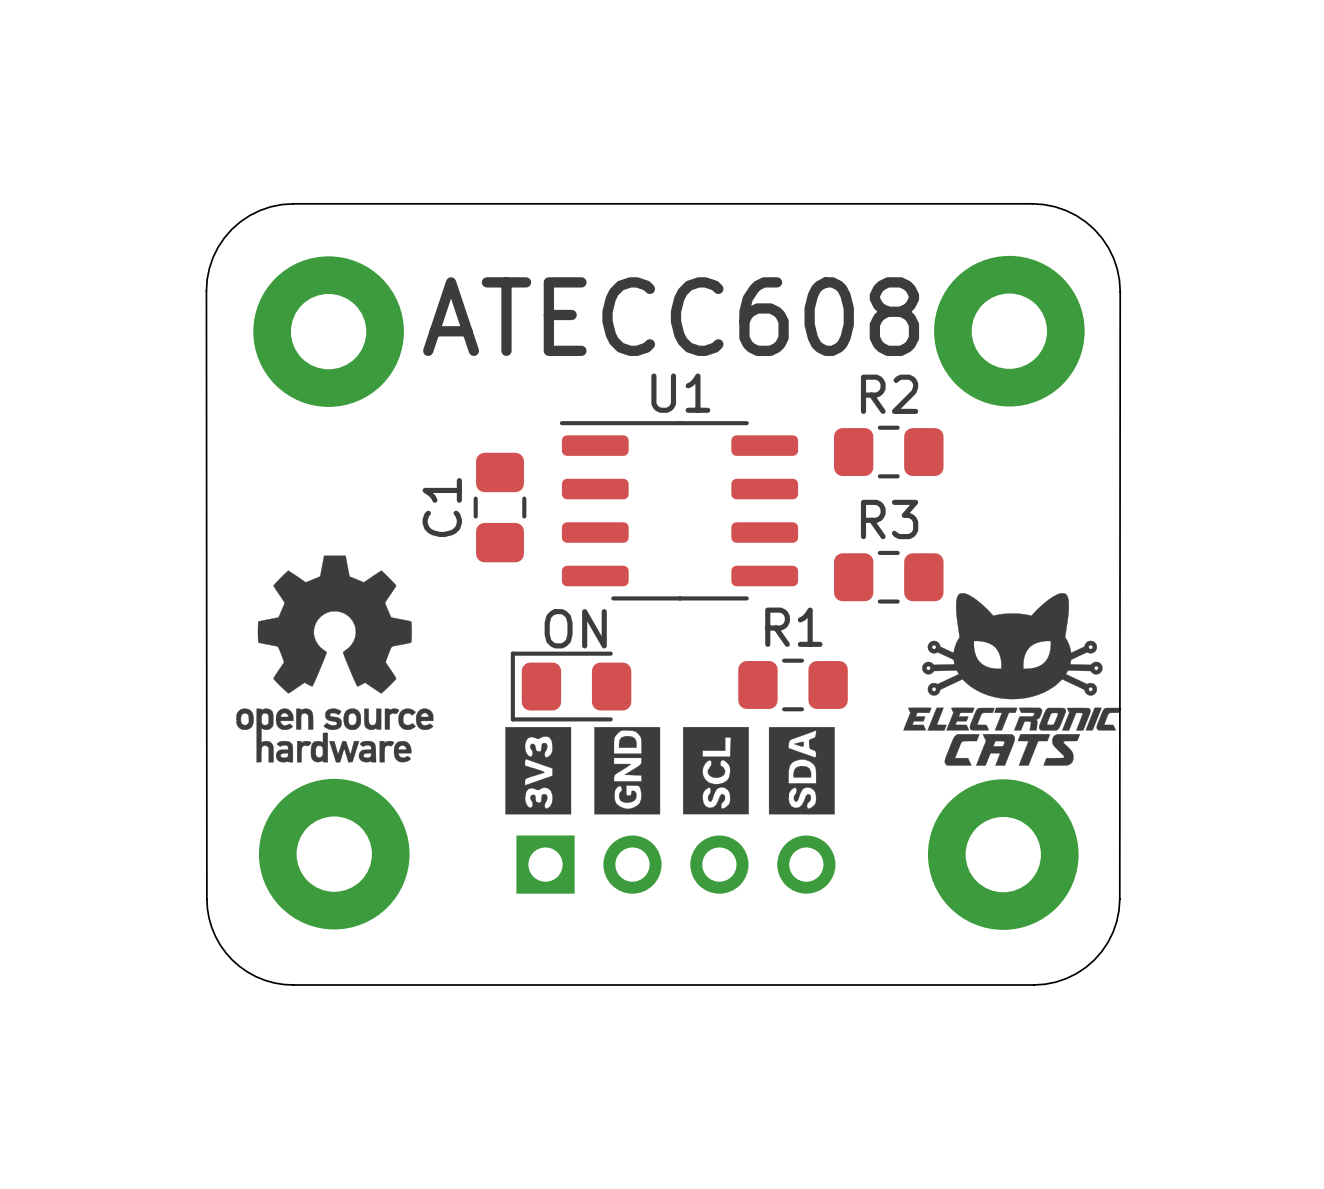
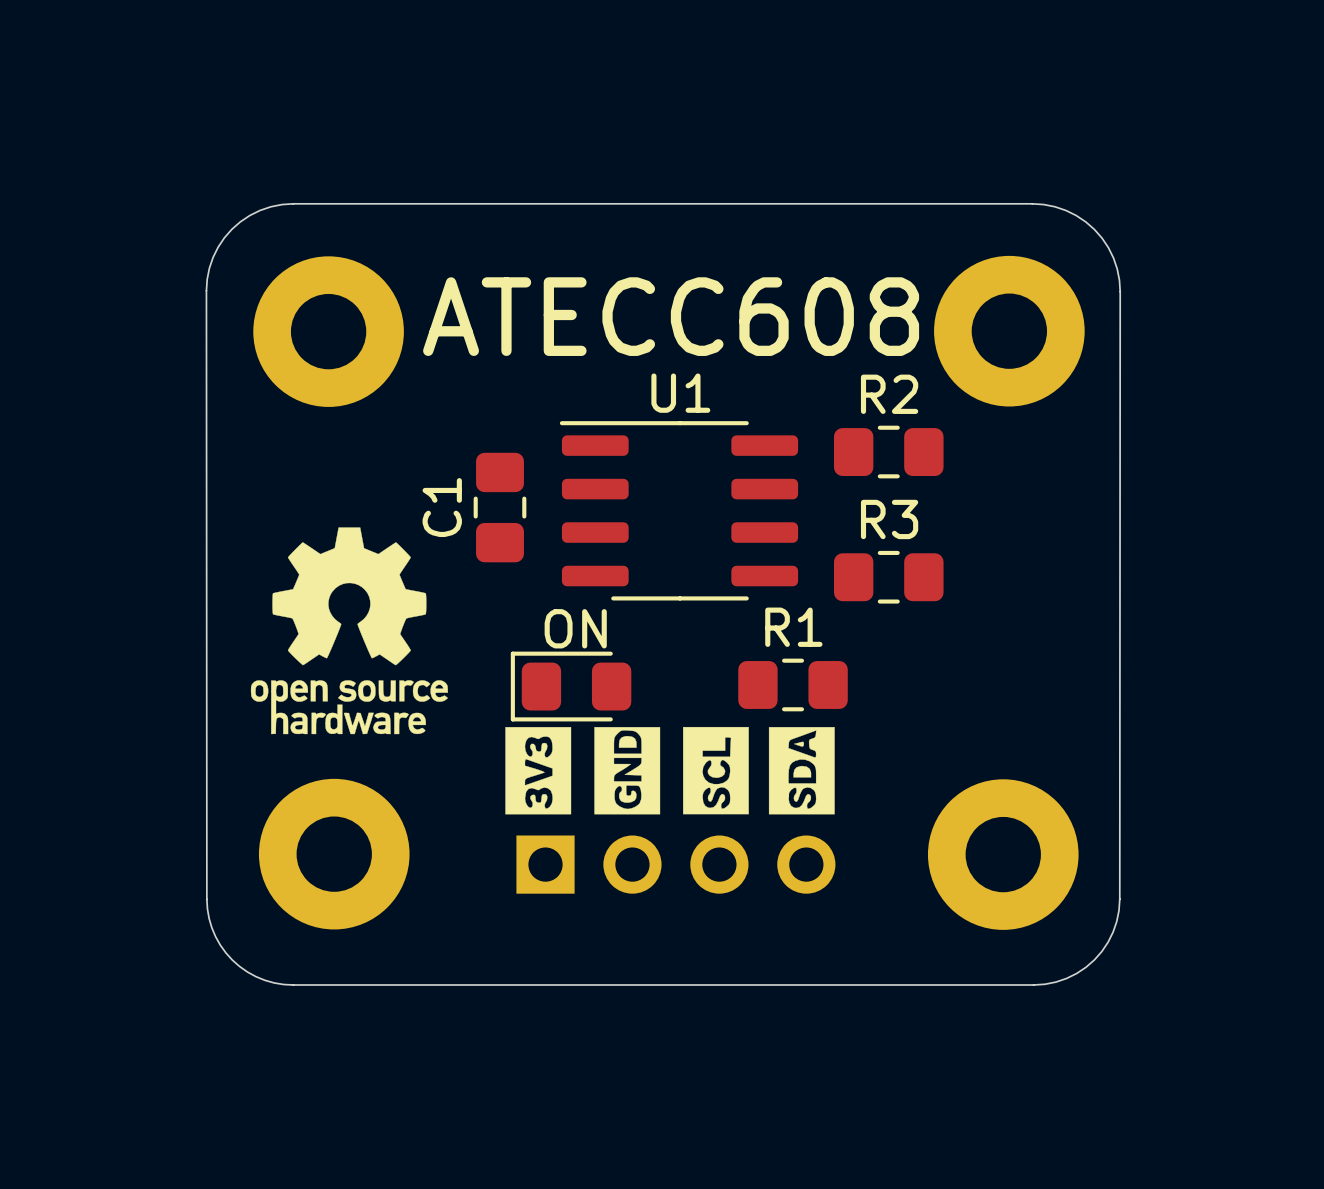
drawing: [903, 593, 1122, 766] -> none
drawing position: (334, 659) -> (349, 630)

